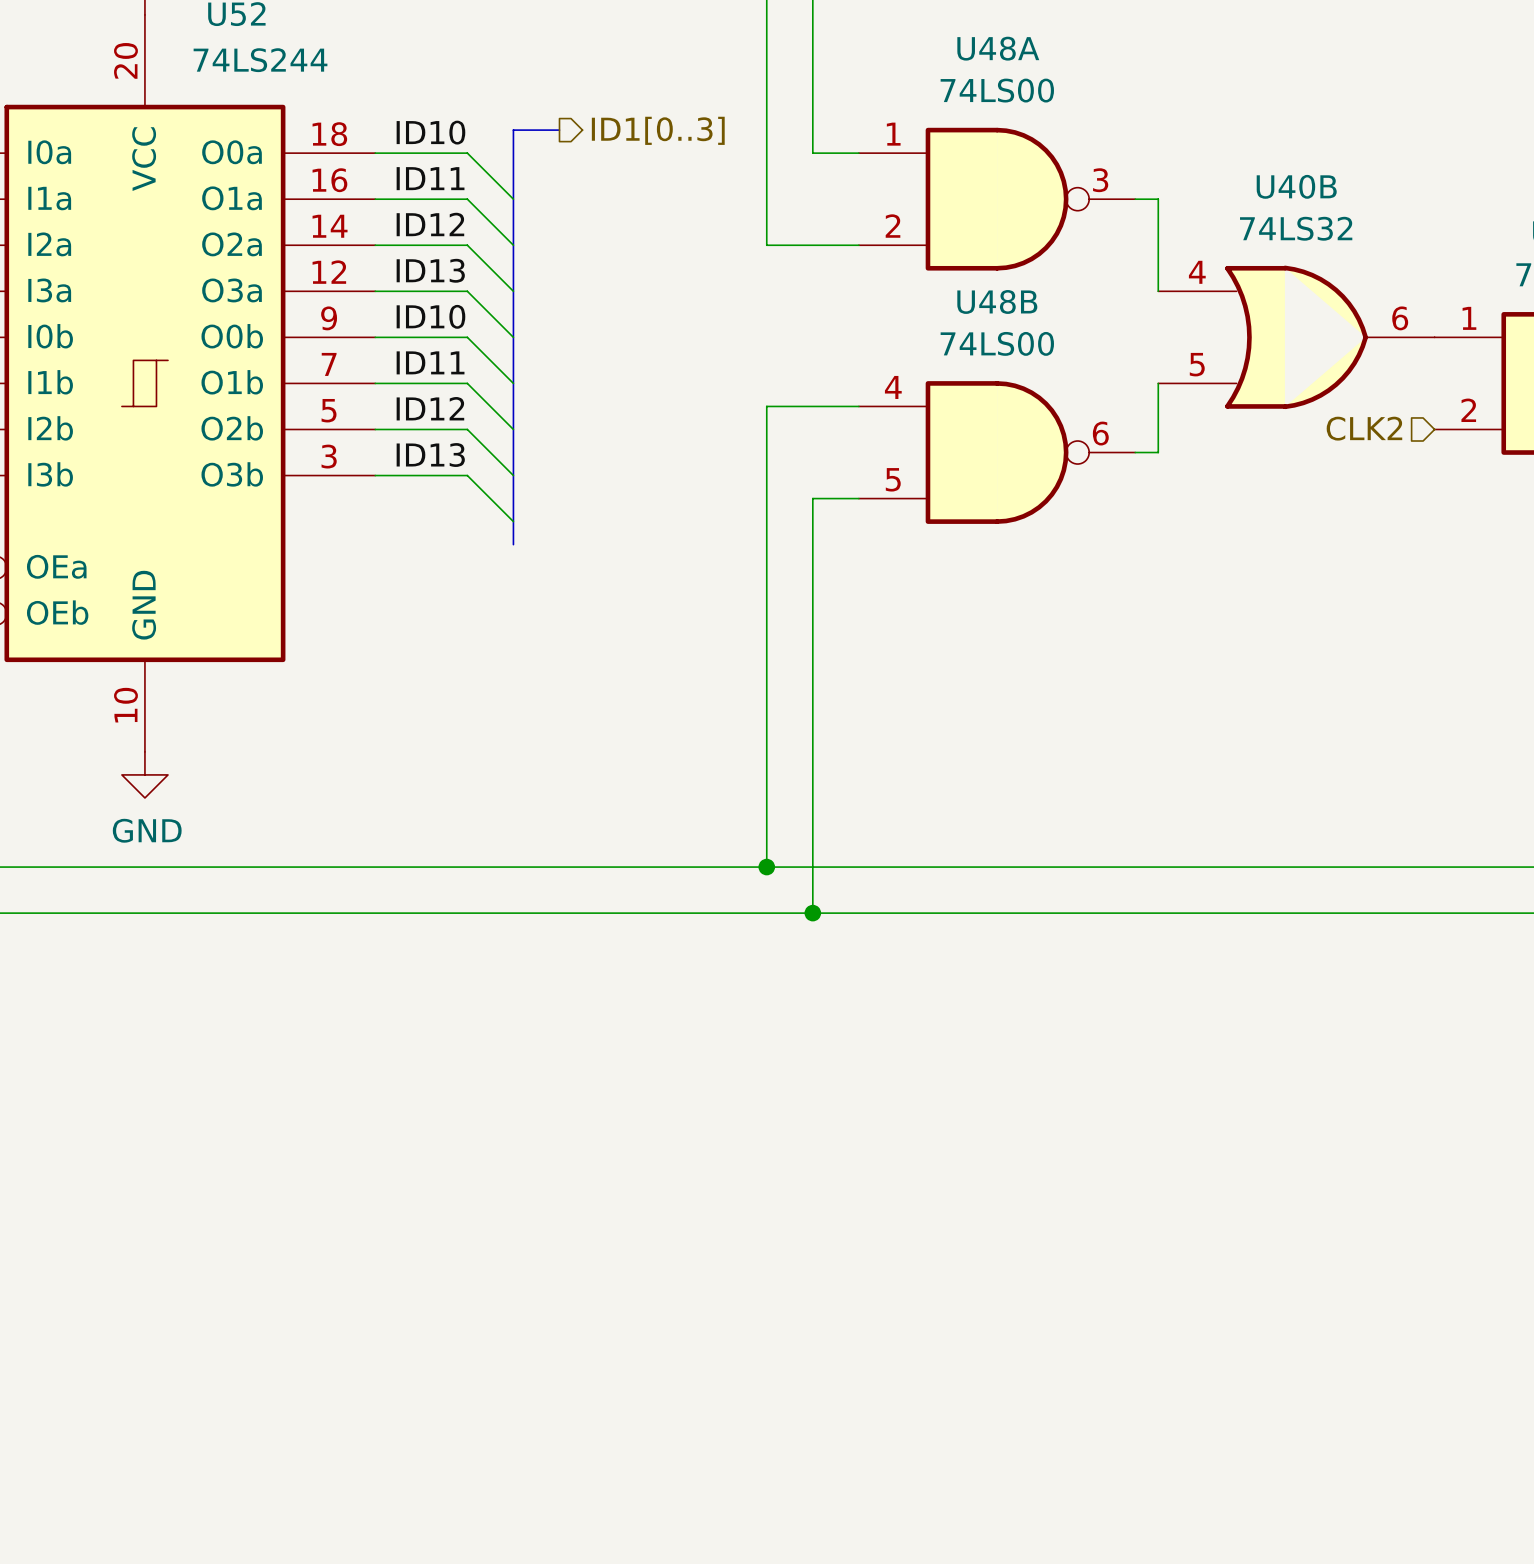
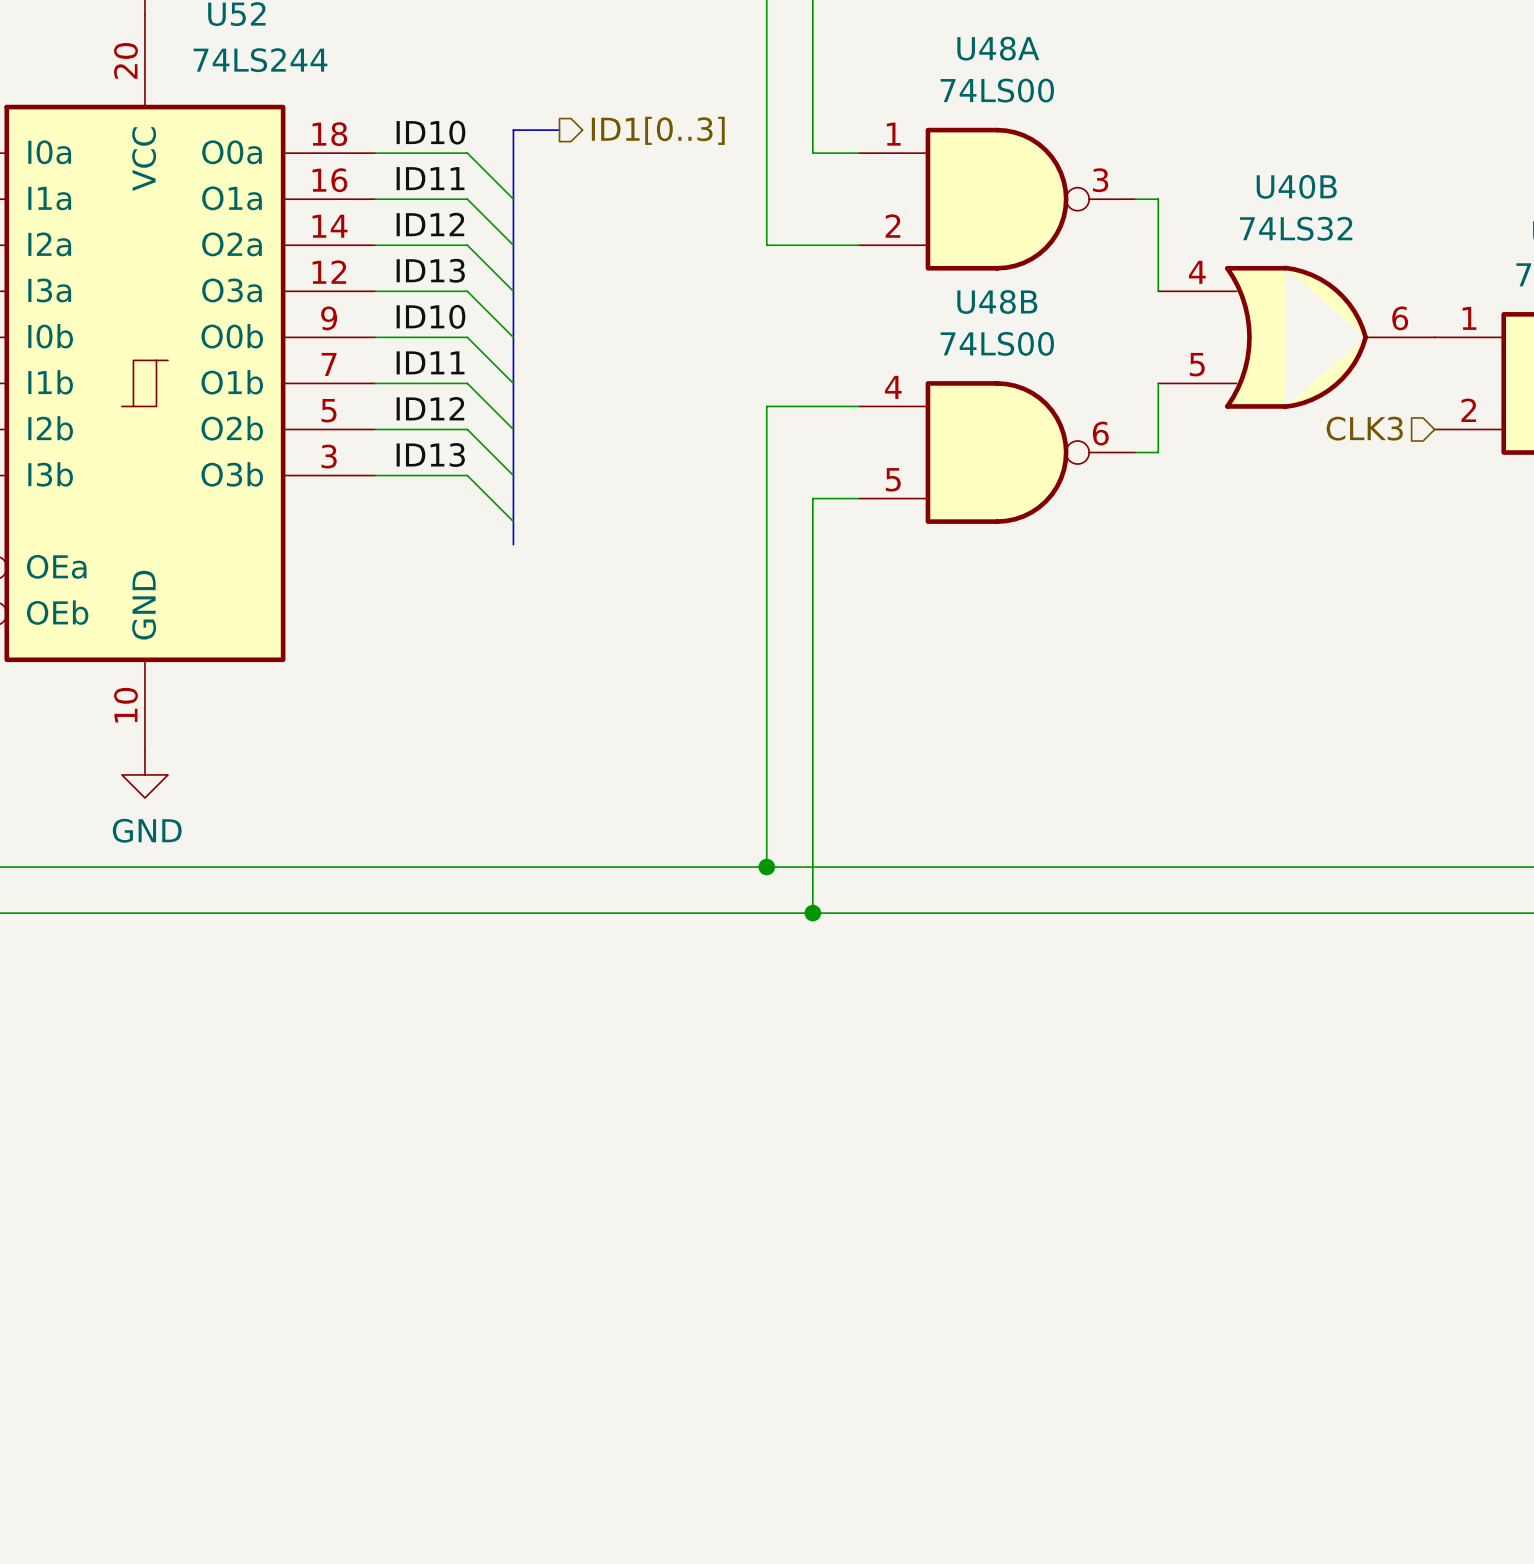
hierarchical label: CLK2 (1364, 428) -> CLK3 (1364, 428)

